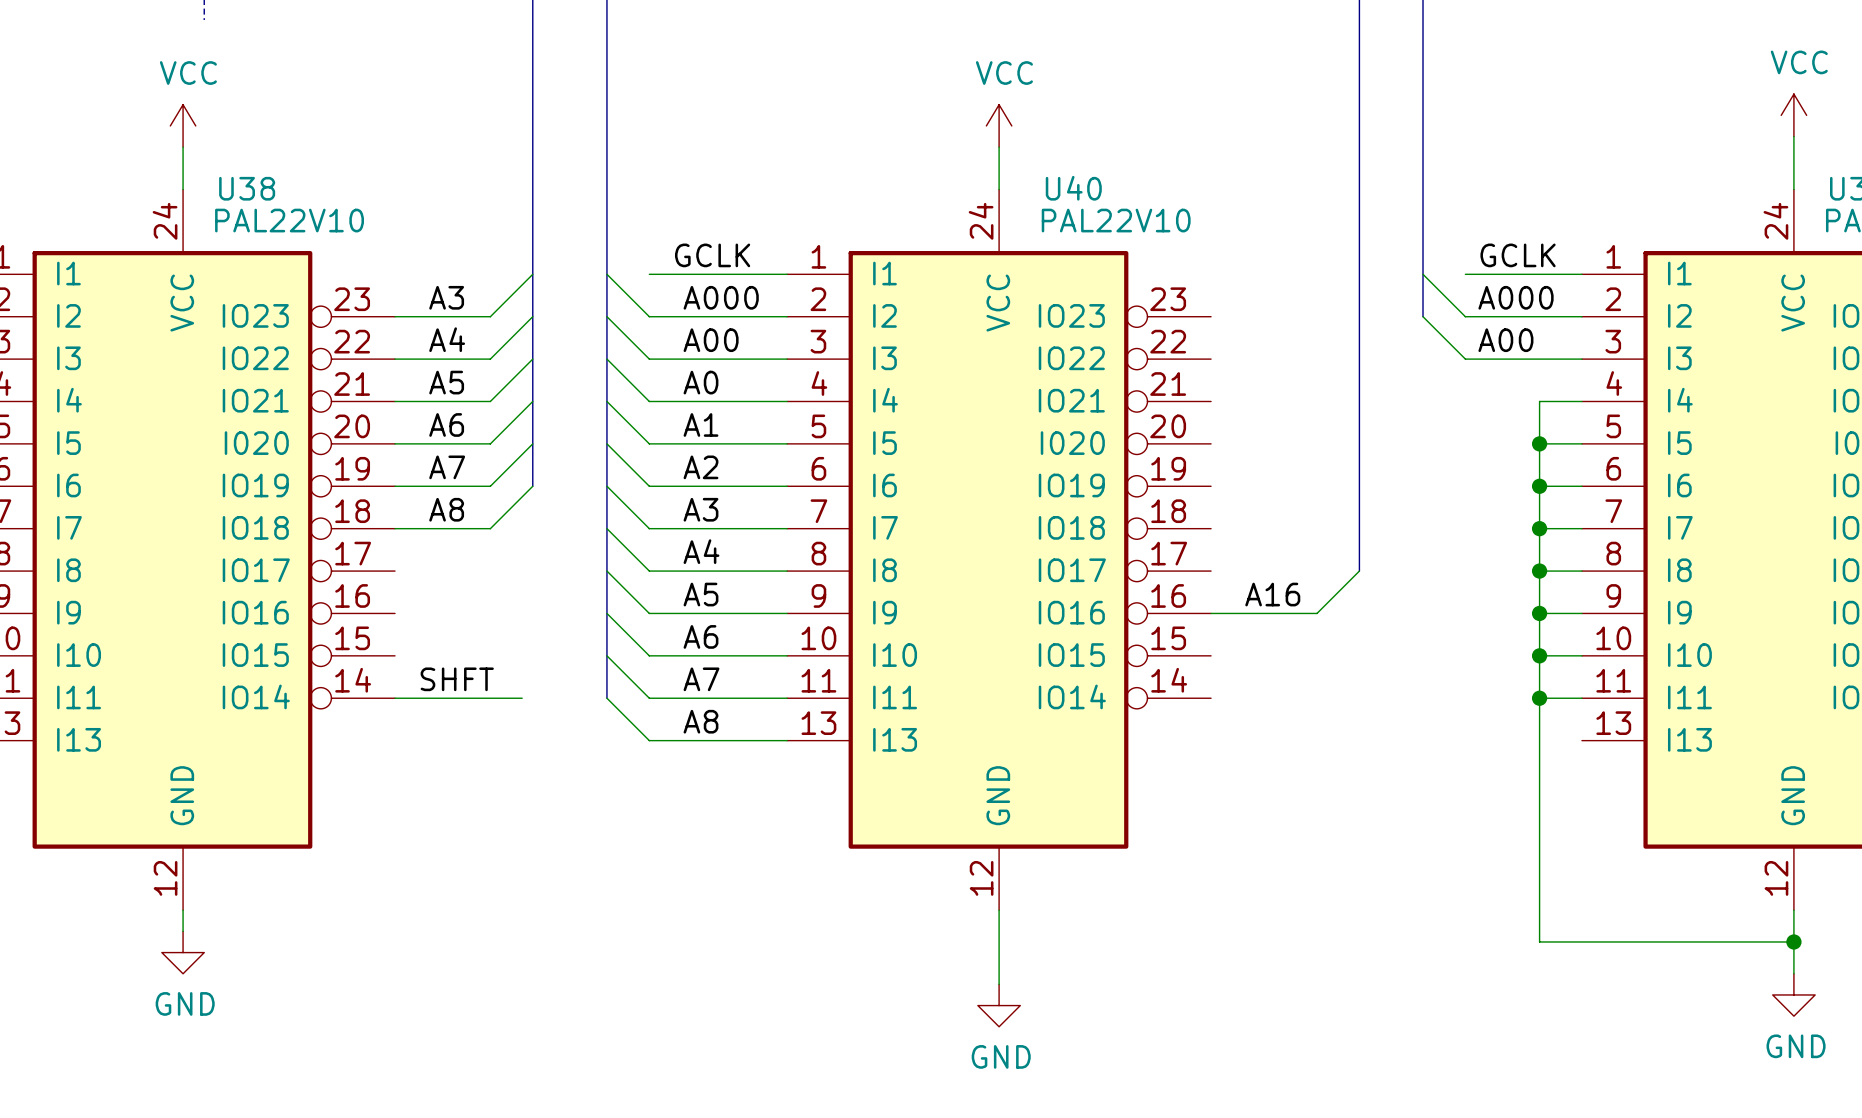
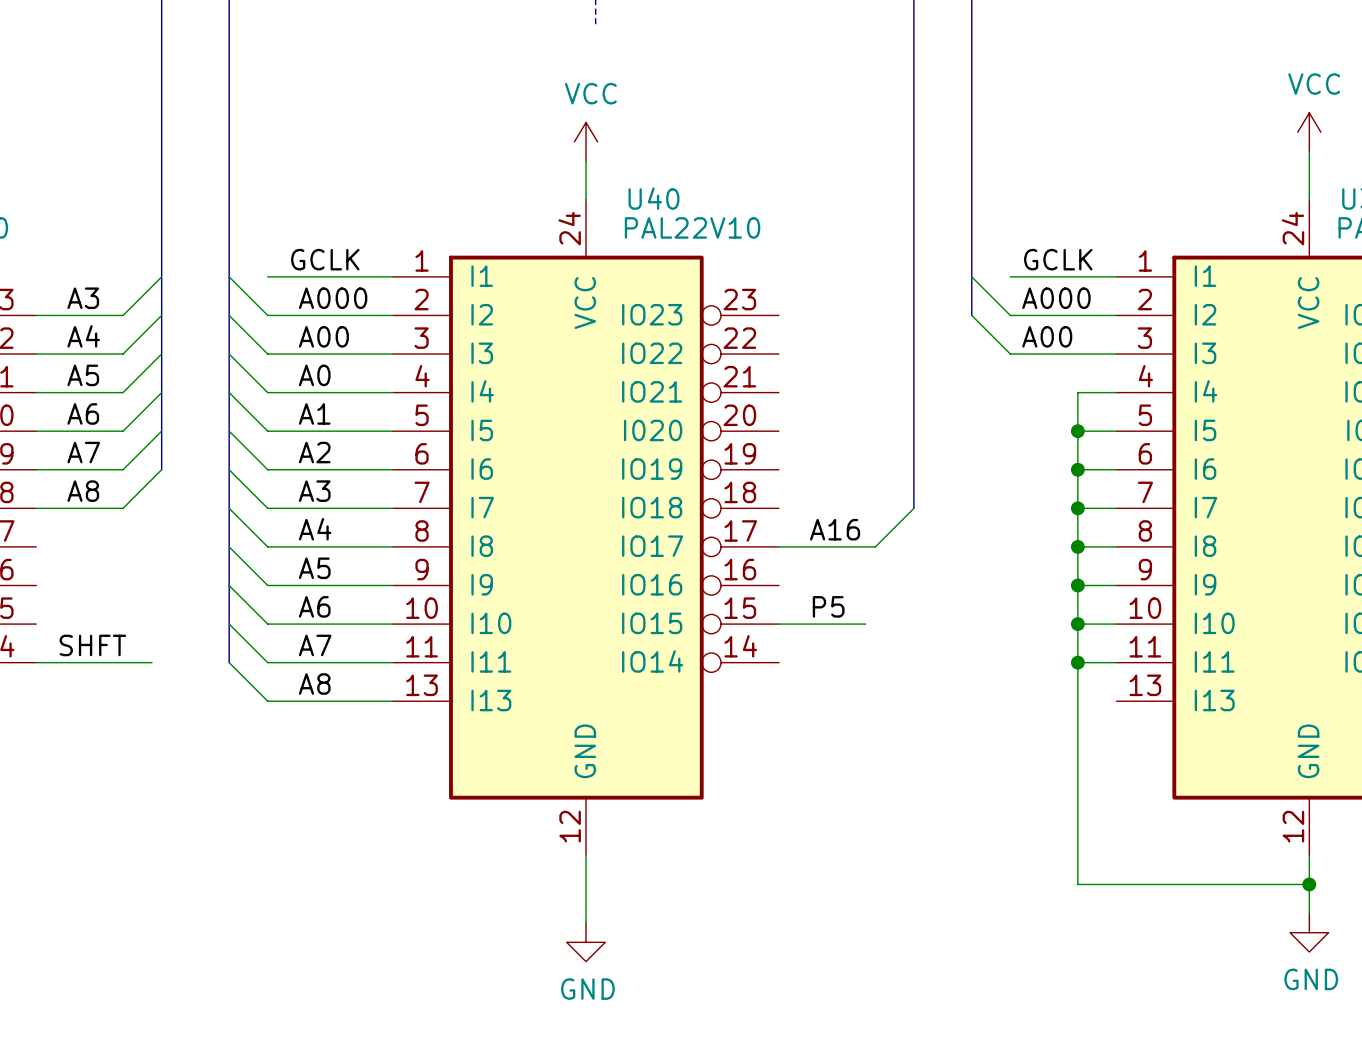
bus: (1359, 528) (1359, 571) -> none
wire: (1359, 571) (1317, 613) (1211, 613) -> (913, 508) (875, 546) (778, 546)
label position: A16 (1272, 594) -> A16 (835, 529)
label: none -> P5 (828, 606)
wire: none -> (778, 624) (865, 624)

